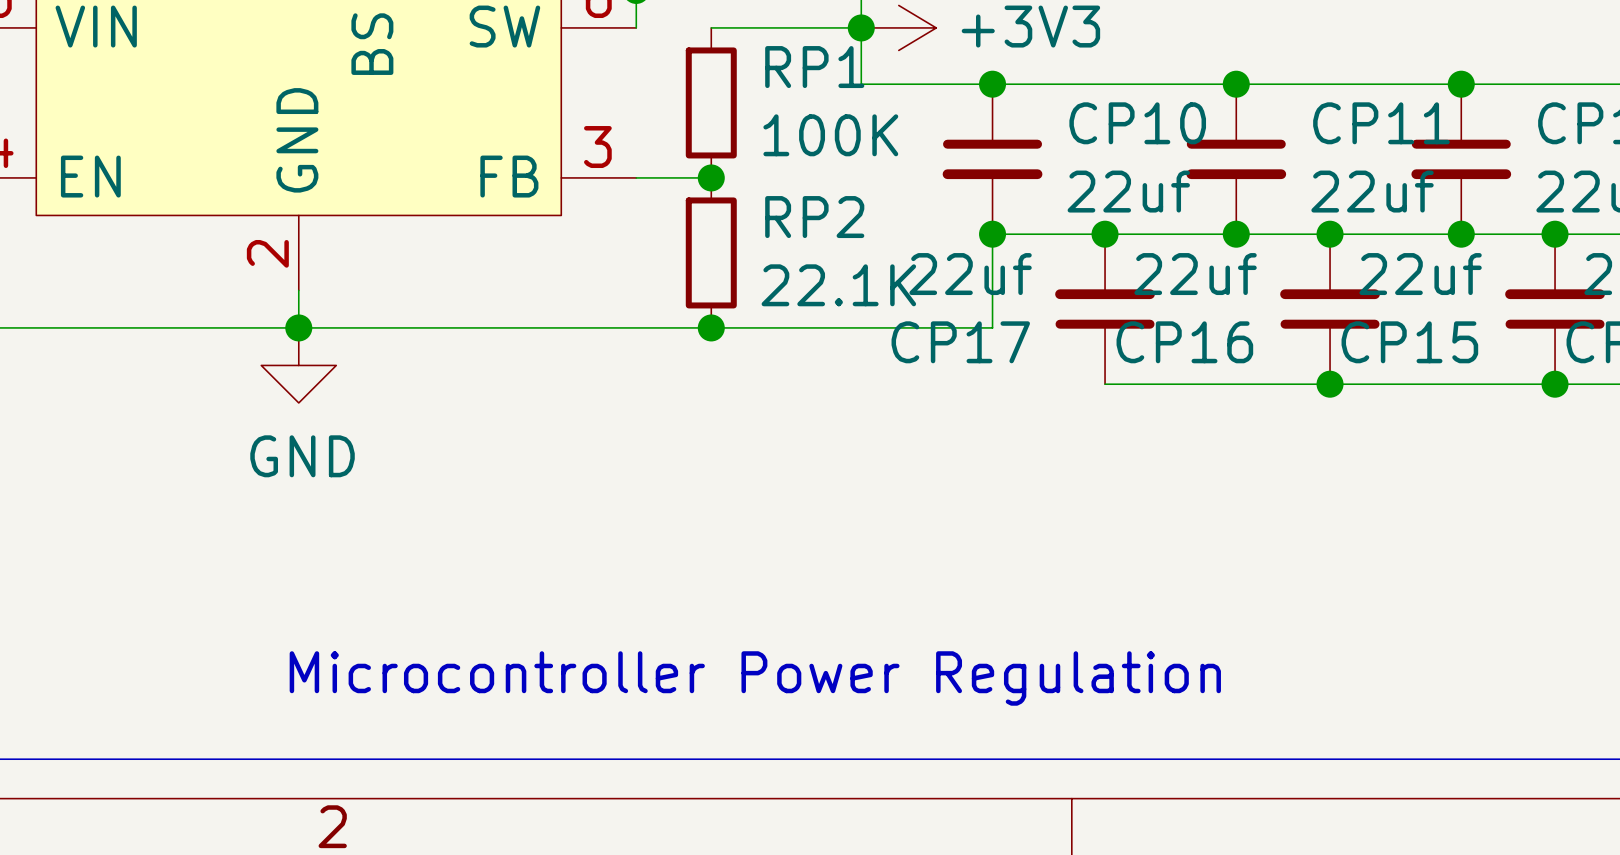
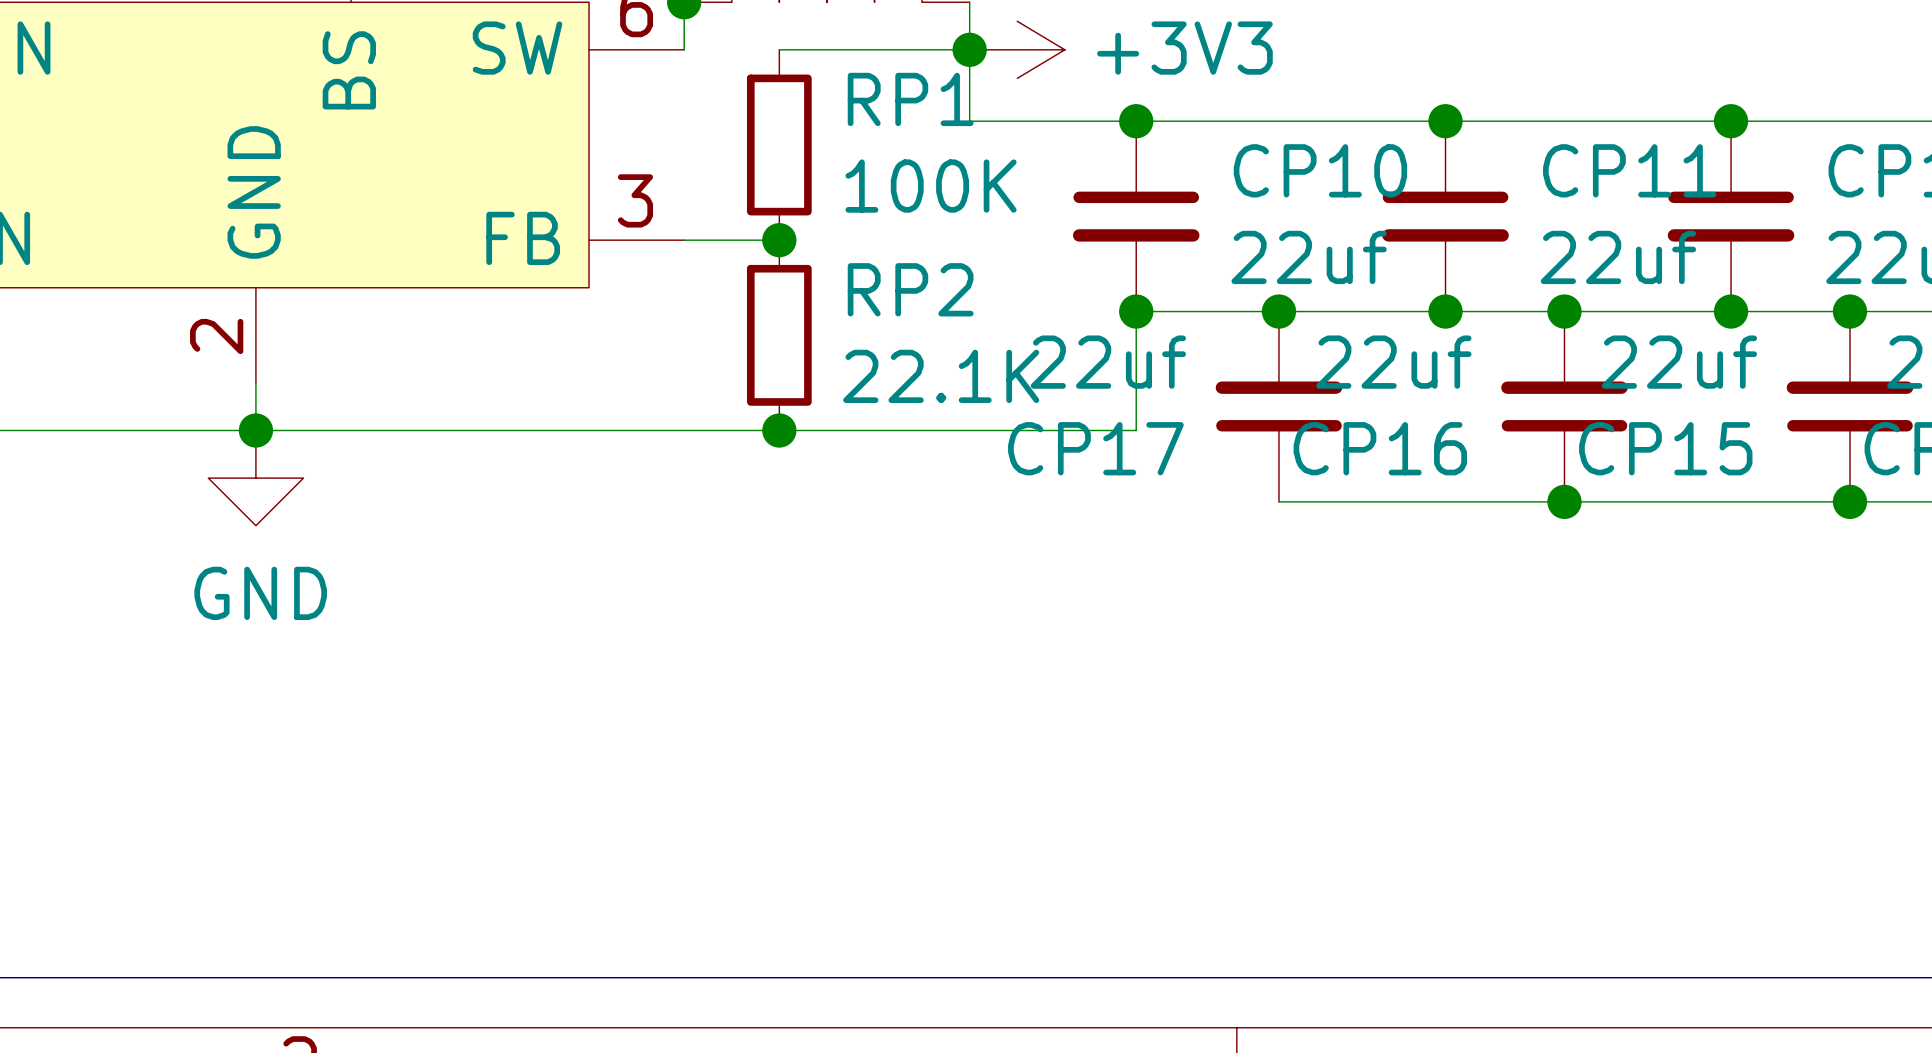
text: Microcontroller Power Regulation (755, 678) -> none

